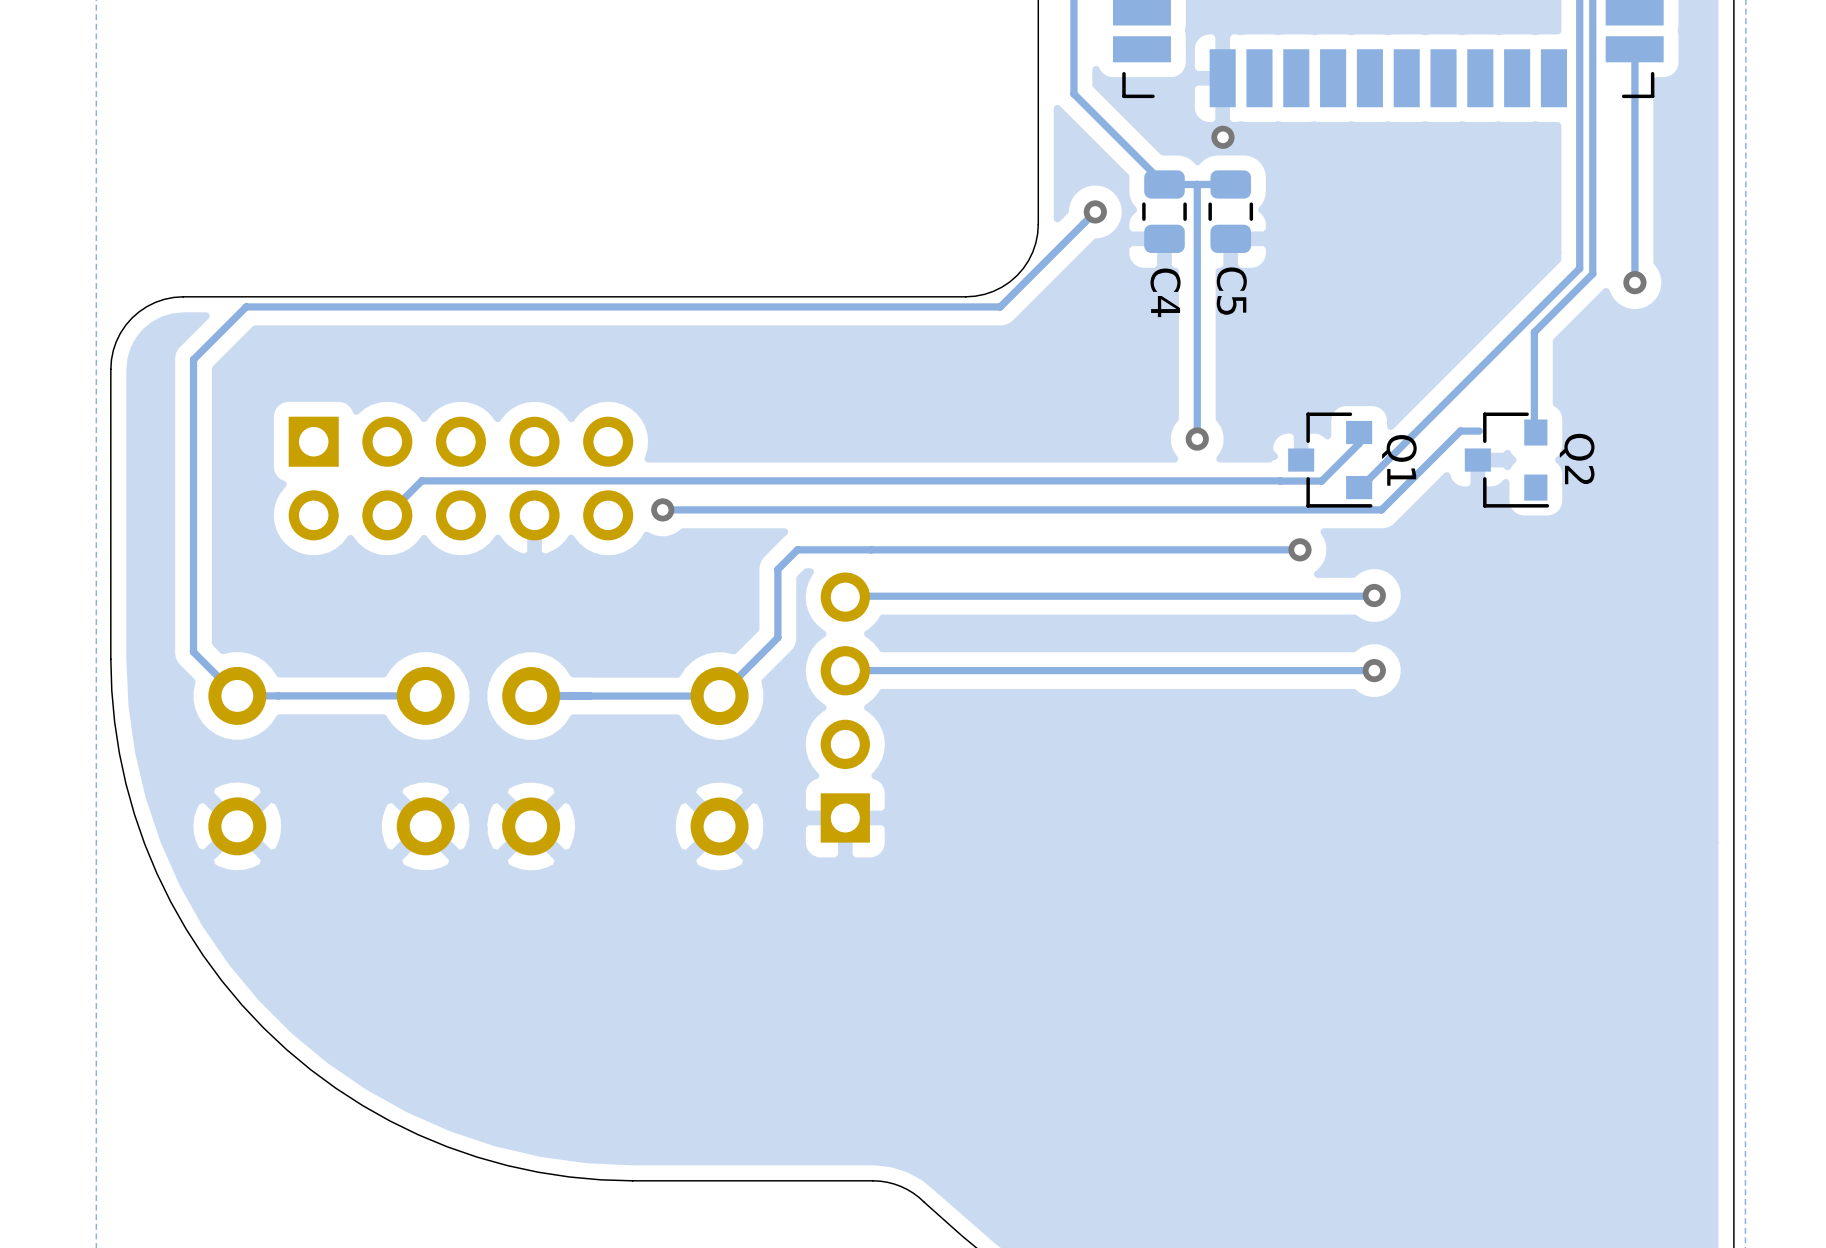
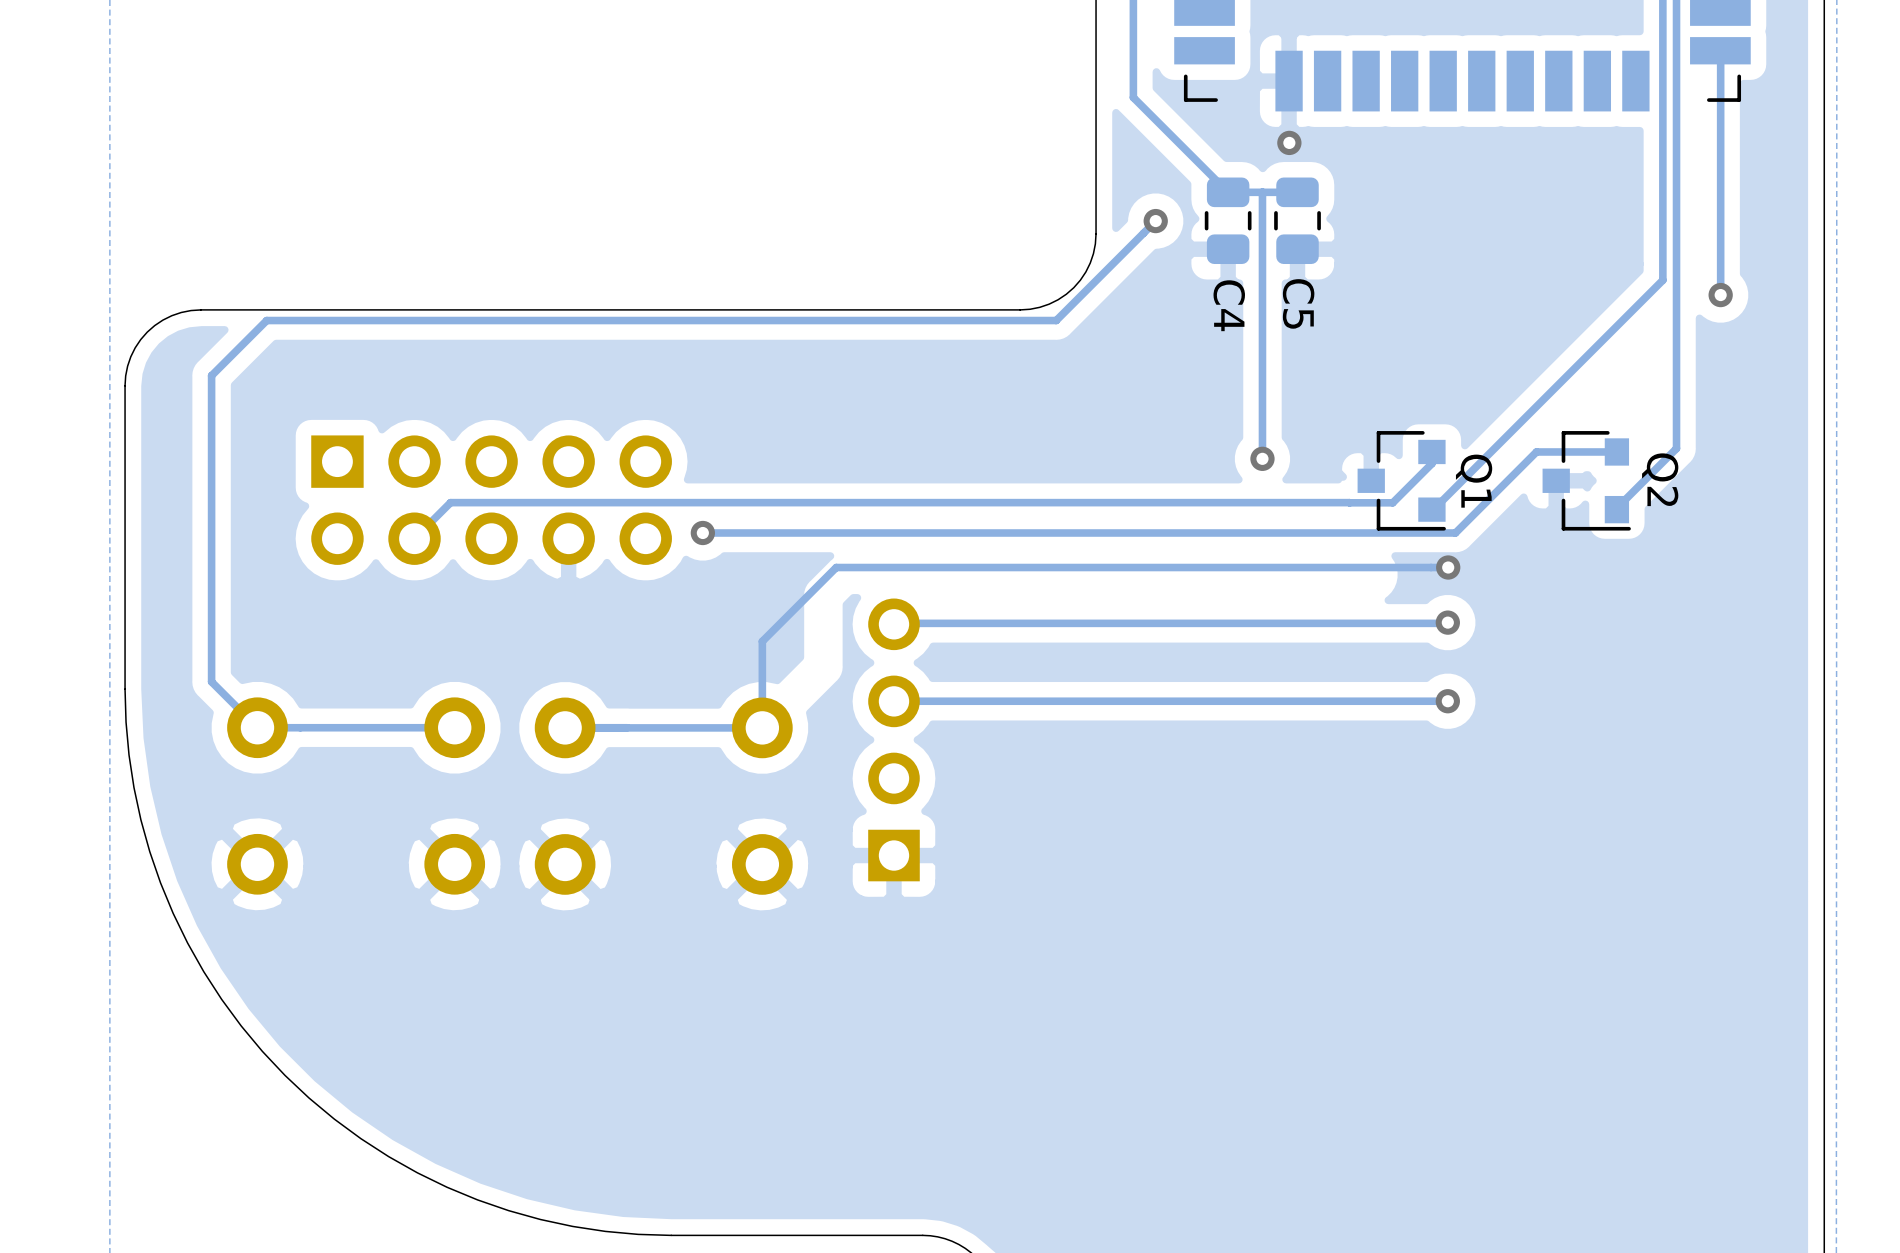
track: (1592, 273) (1534, 332) (1534, 431) -> (1676, 285) (1676, 448) (1616, 509)
track: (1479, 431) (1459, 432) -> (1616, 451) (1536, 451)
track: (1299, 549) (797, 549) (777, 569) (777, 637) (719, 696) -> (1448, 567) (836, 567) (762, 641) (762, 727)
via position: (1299, 549) -> (1448, 567)

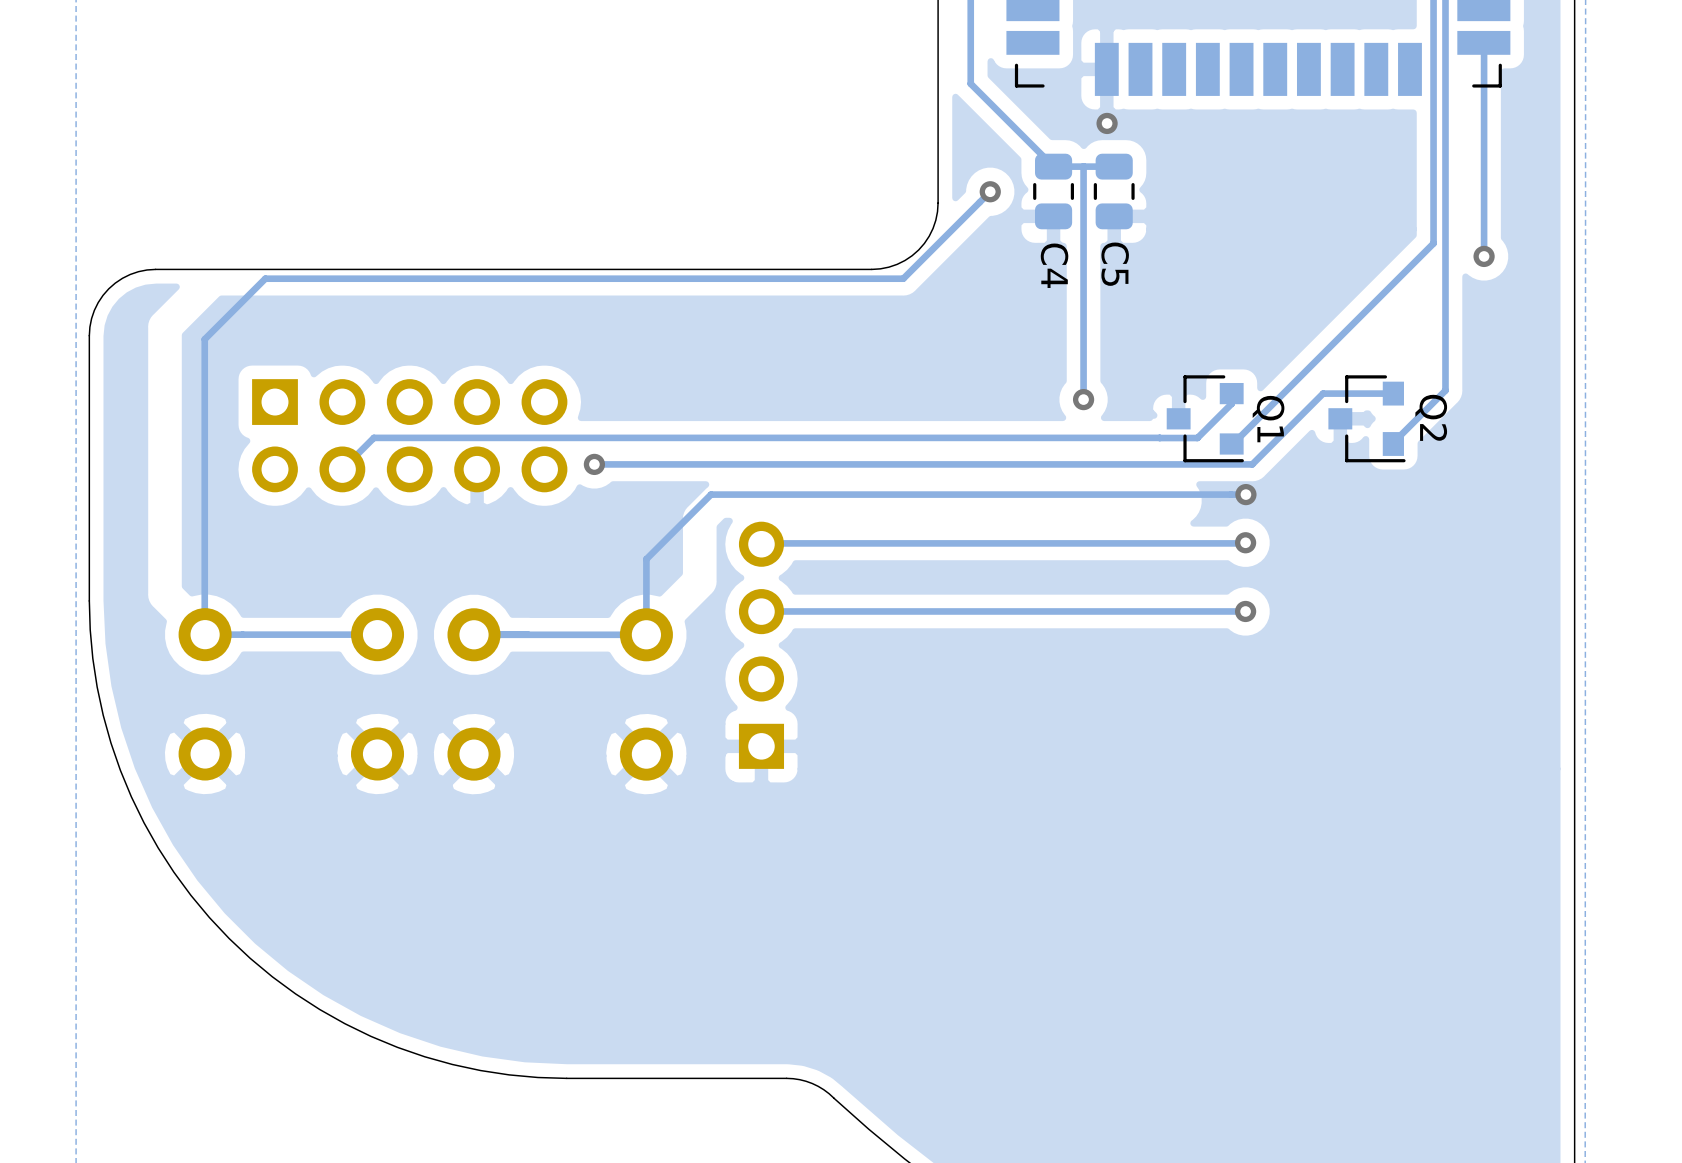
track: (326, 320) (266, 320) (211, 375) (211, 681) (257, 727) -> (265, 278) (204, 339) (204, 634)

